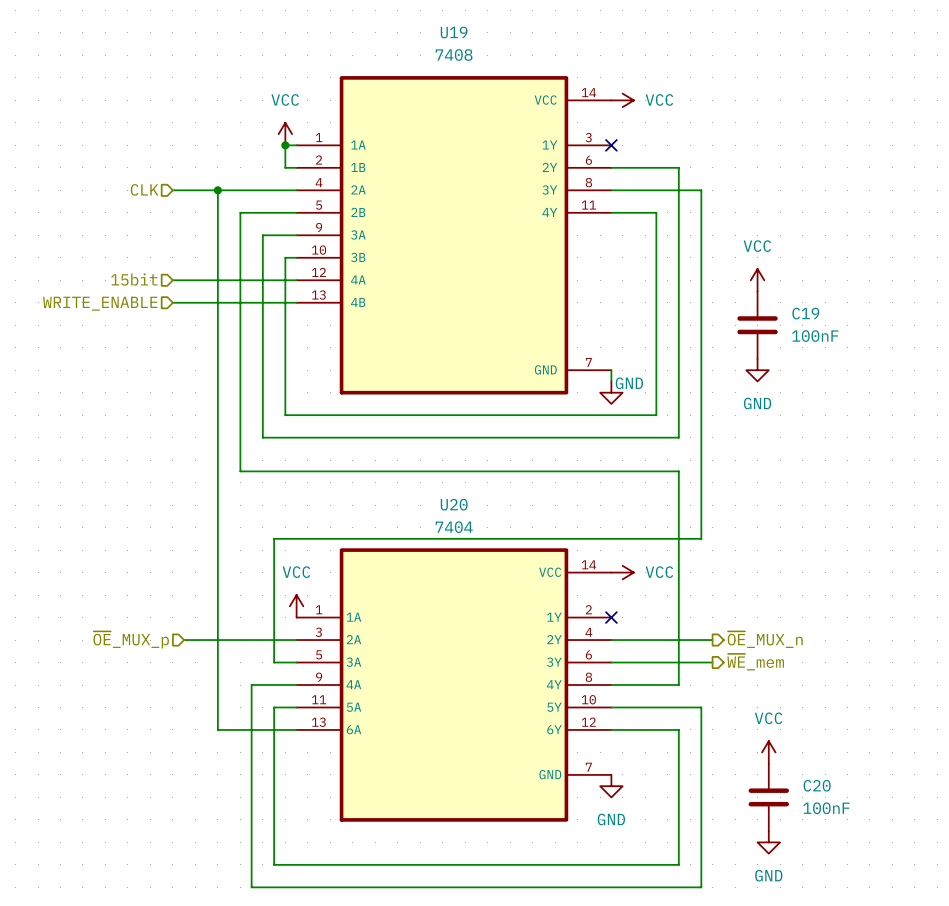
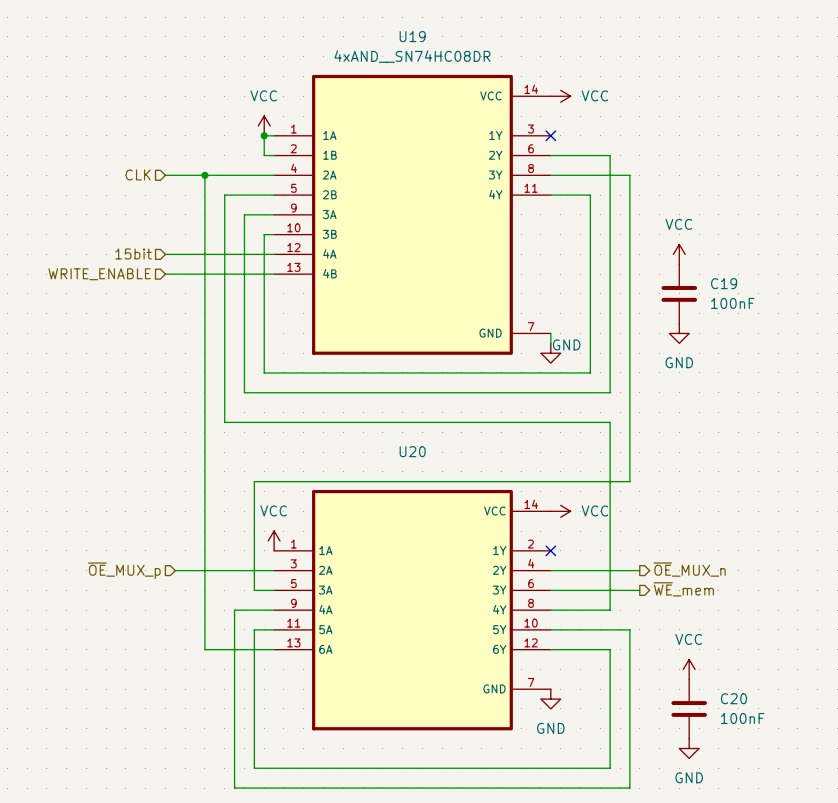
U19 value: 7408 (454, 54) -> 4xAND__SN74HC08DR (412, 56)
U20 value: 7404 (454, 527) -> none

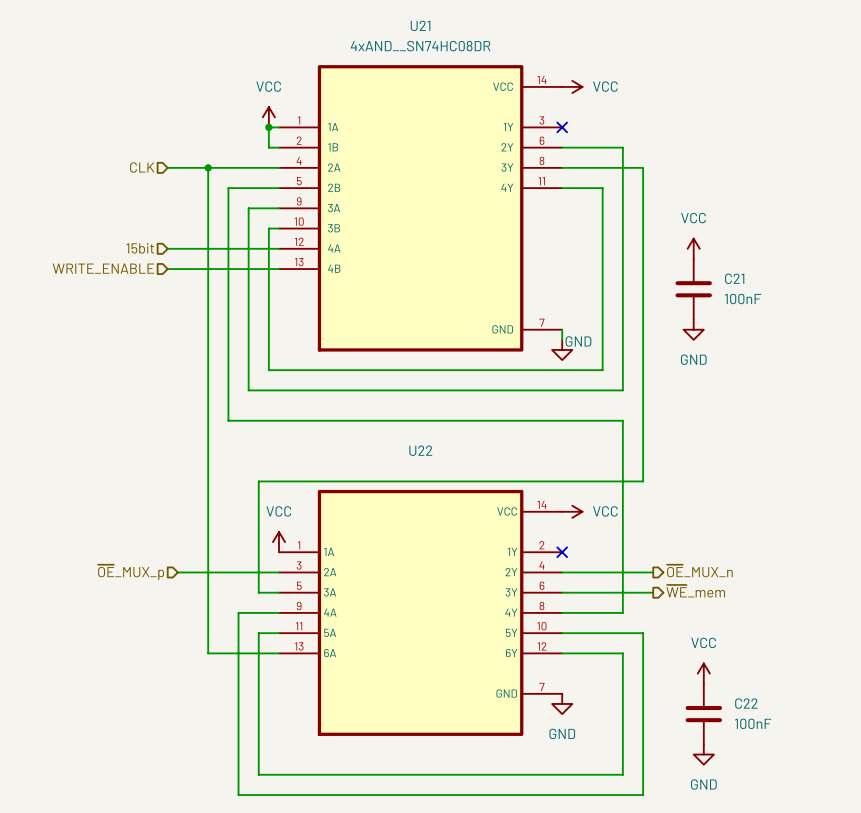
U19 name: U19 (412, 36) -> U21 (420, 25)
C19 name: C19 (724, 283) -> C21 (734, 278)
U20 name: U20 (412, 451) -> U22 (420, 450)
C20 name: C20 (733, 698) -> C22 (746, 703)

